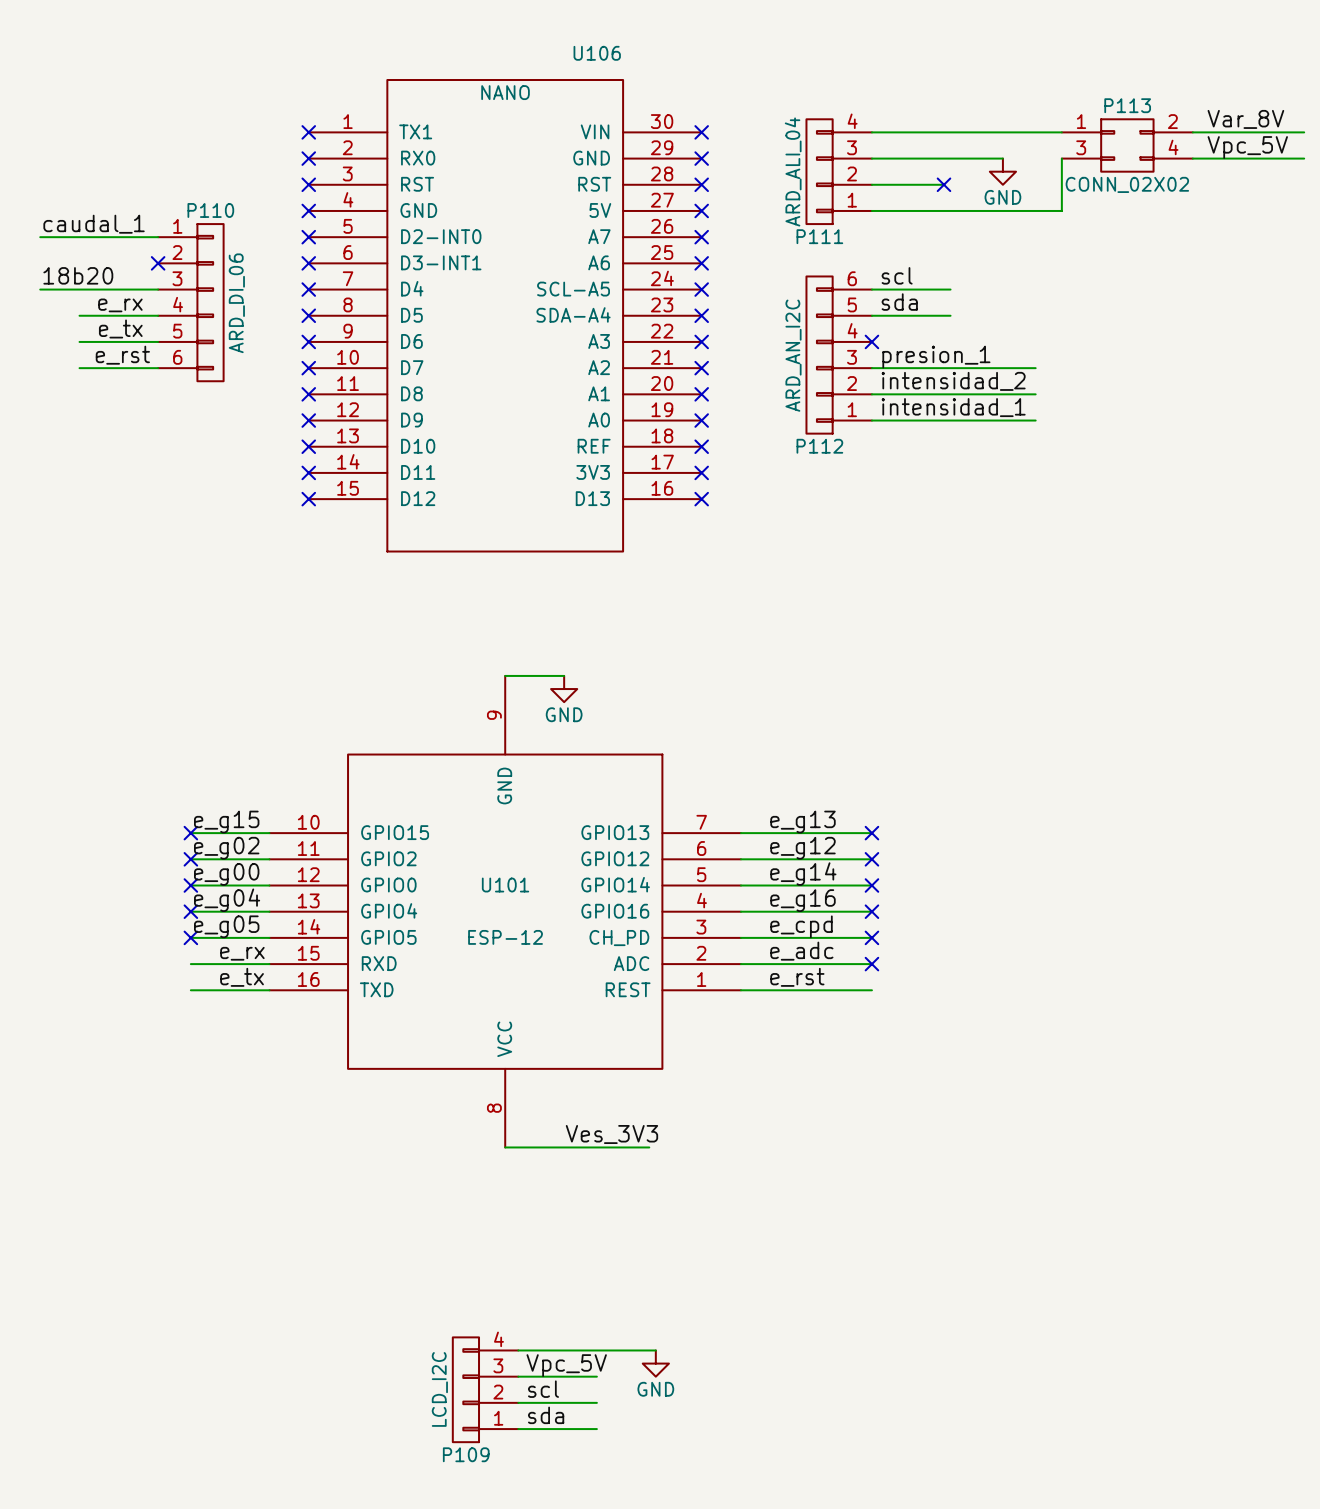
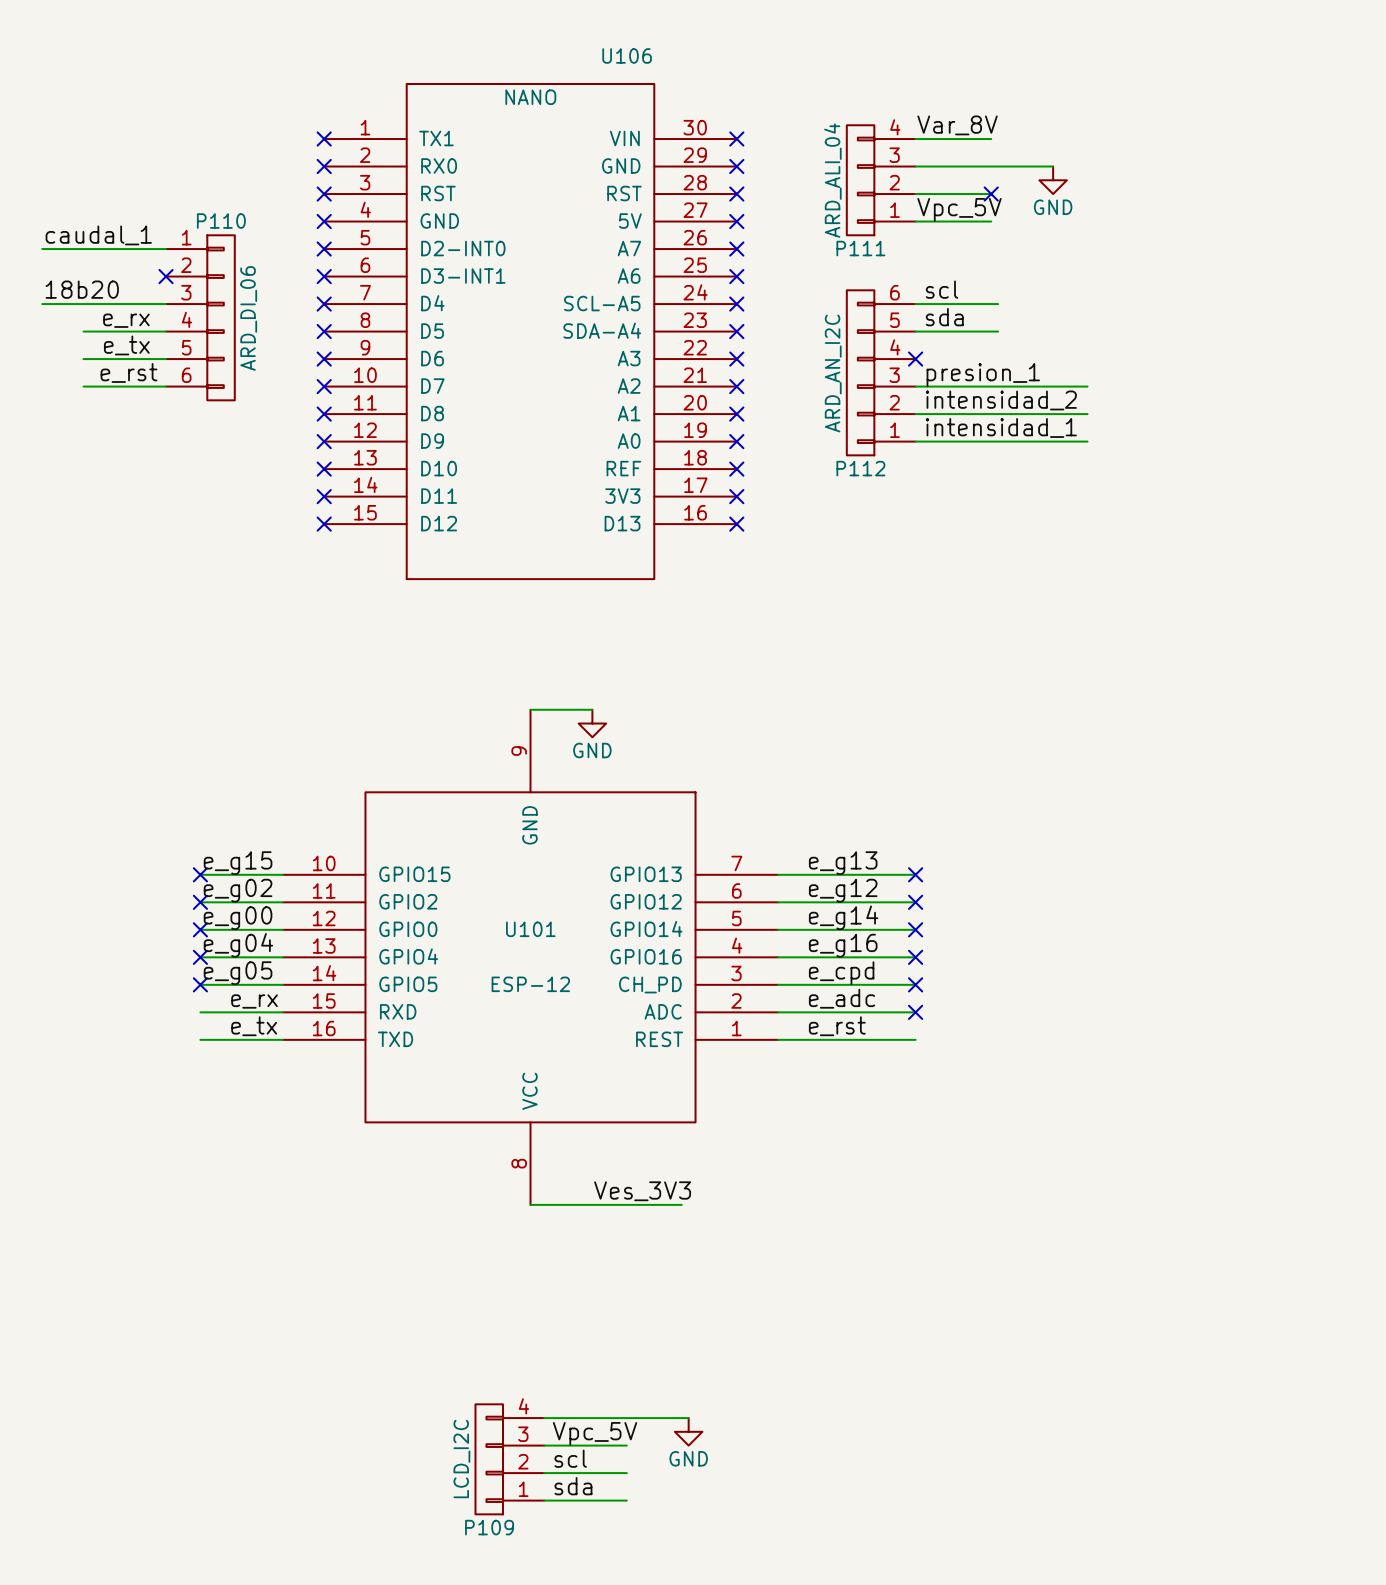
label: none -> Var_8V (957, 125)
label: Var_8V (1245, 119) -> none
wire: (943, 132) (1061, 132) -> none
wire: (1192, 132) (1304, 132) -> none
P113: CONN_02X02 (1127, 145) -> none
label: Vpc_5V (1247, 147) -> none
wire: (1061, 158) (1061, 210) (943, 210) -> none
wire: (1192, 158) (1304, 158) -> none
label: none -> Vpc_5V (959, 209)

